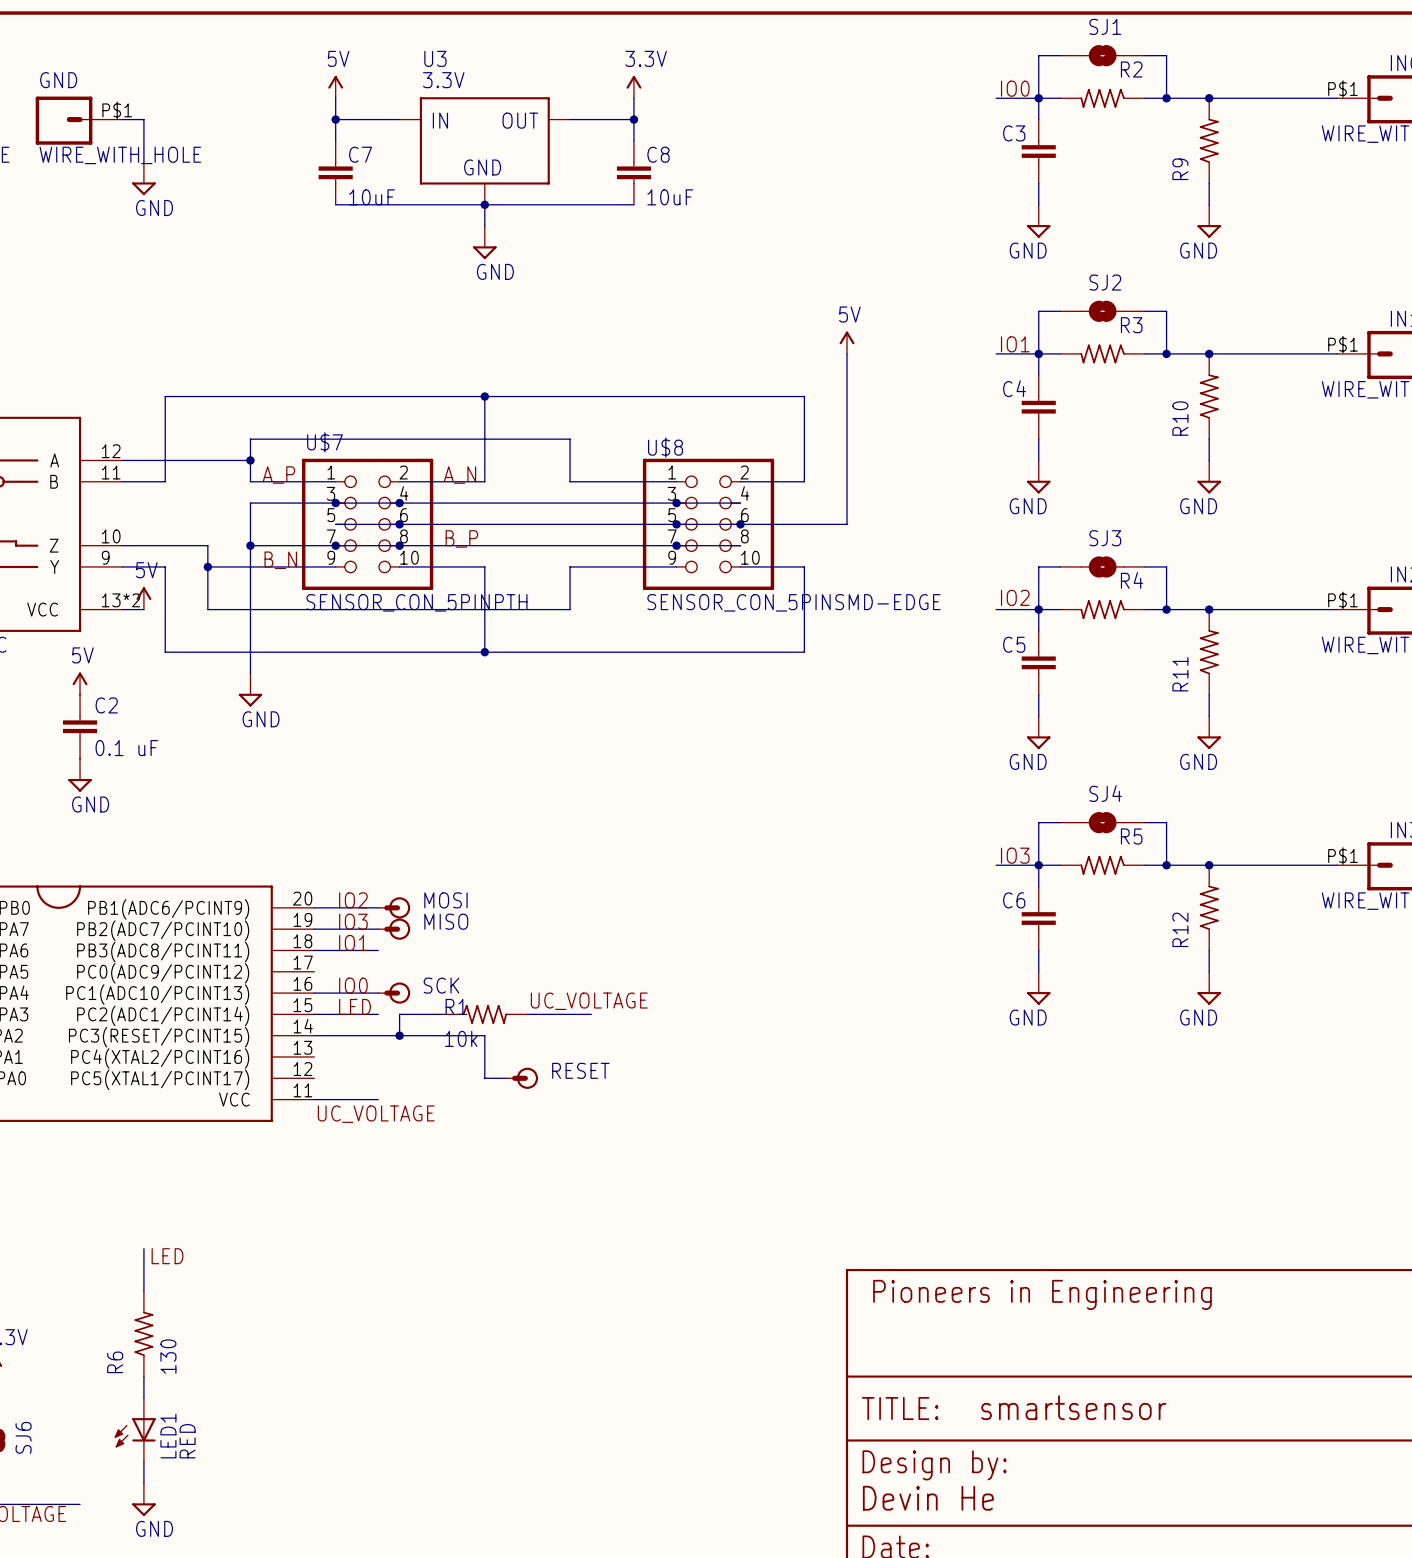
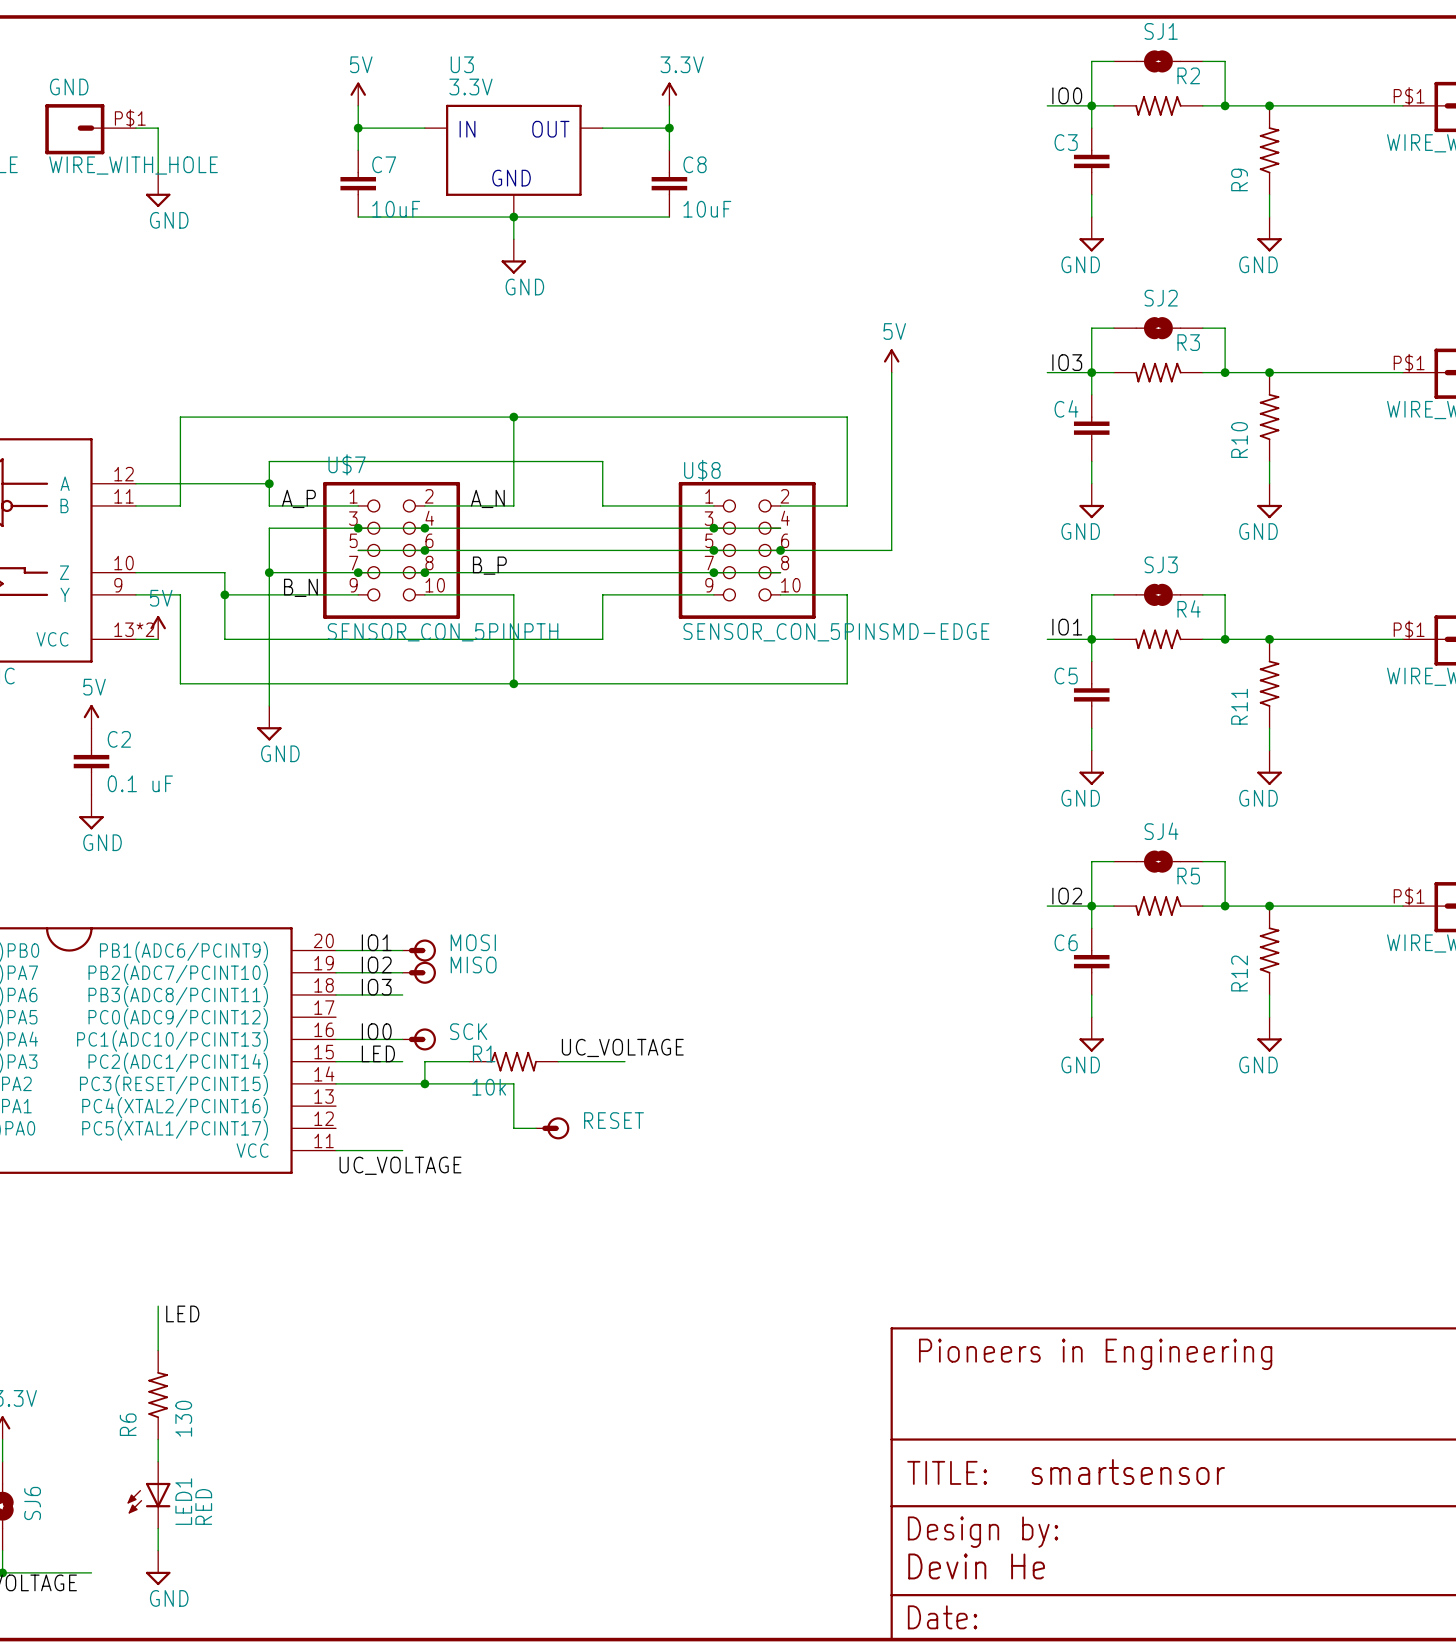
label: IO1 (1015, 344) -> IO3 (1067, 362)
label: IO2 (1015, 597) -> IO1 (1067, 627)
label: IO3 (1015, 855) -> IO2 (1067, 896)
label: IO2 (353, 900) -> IO1 (376, 942)
label: IO3 (353, 921) -> IO2 (376, 964)
label: IO1 (353, 943) -> IO3 (376, 987)

